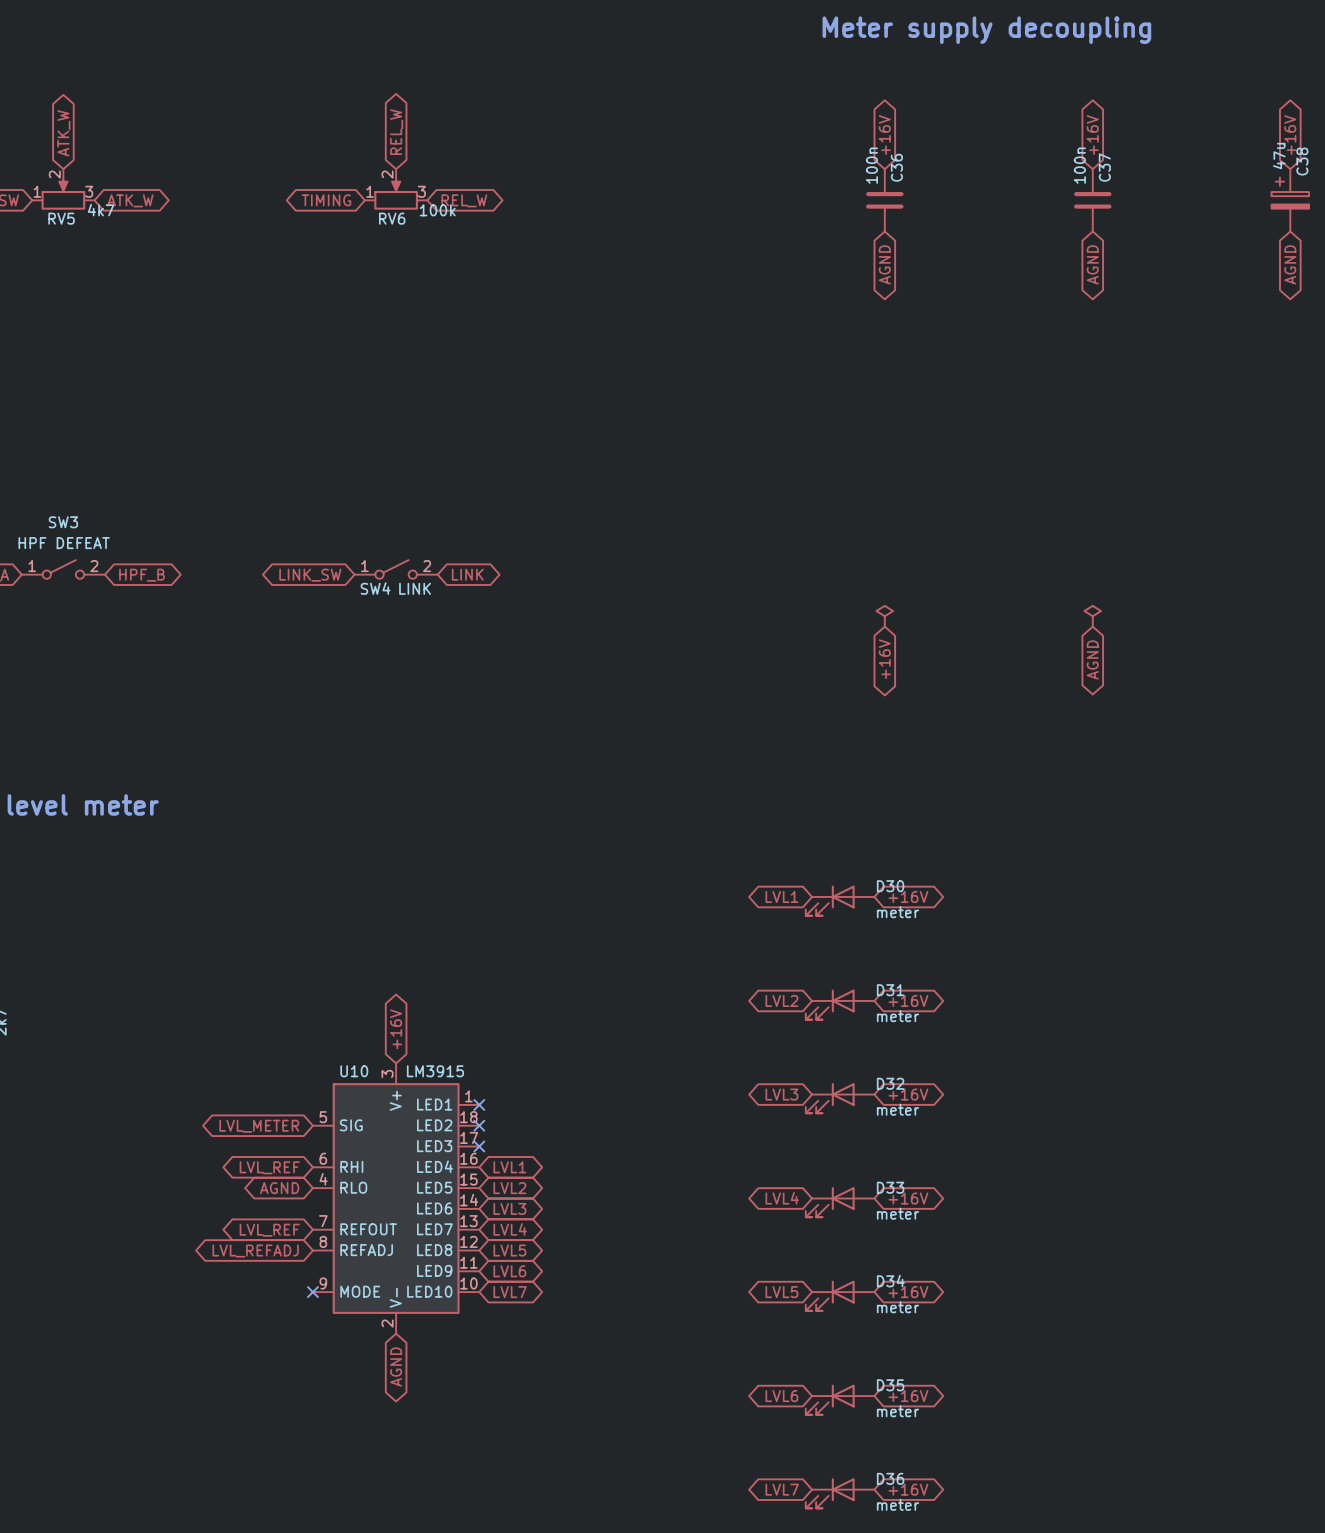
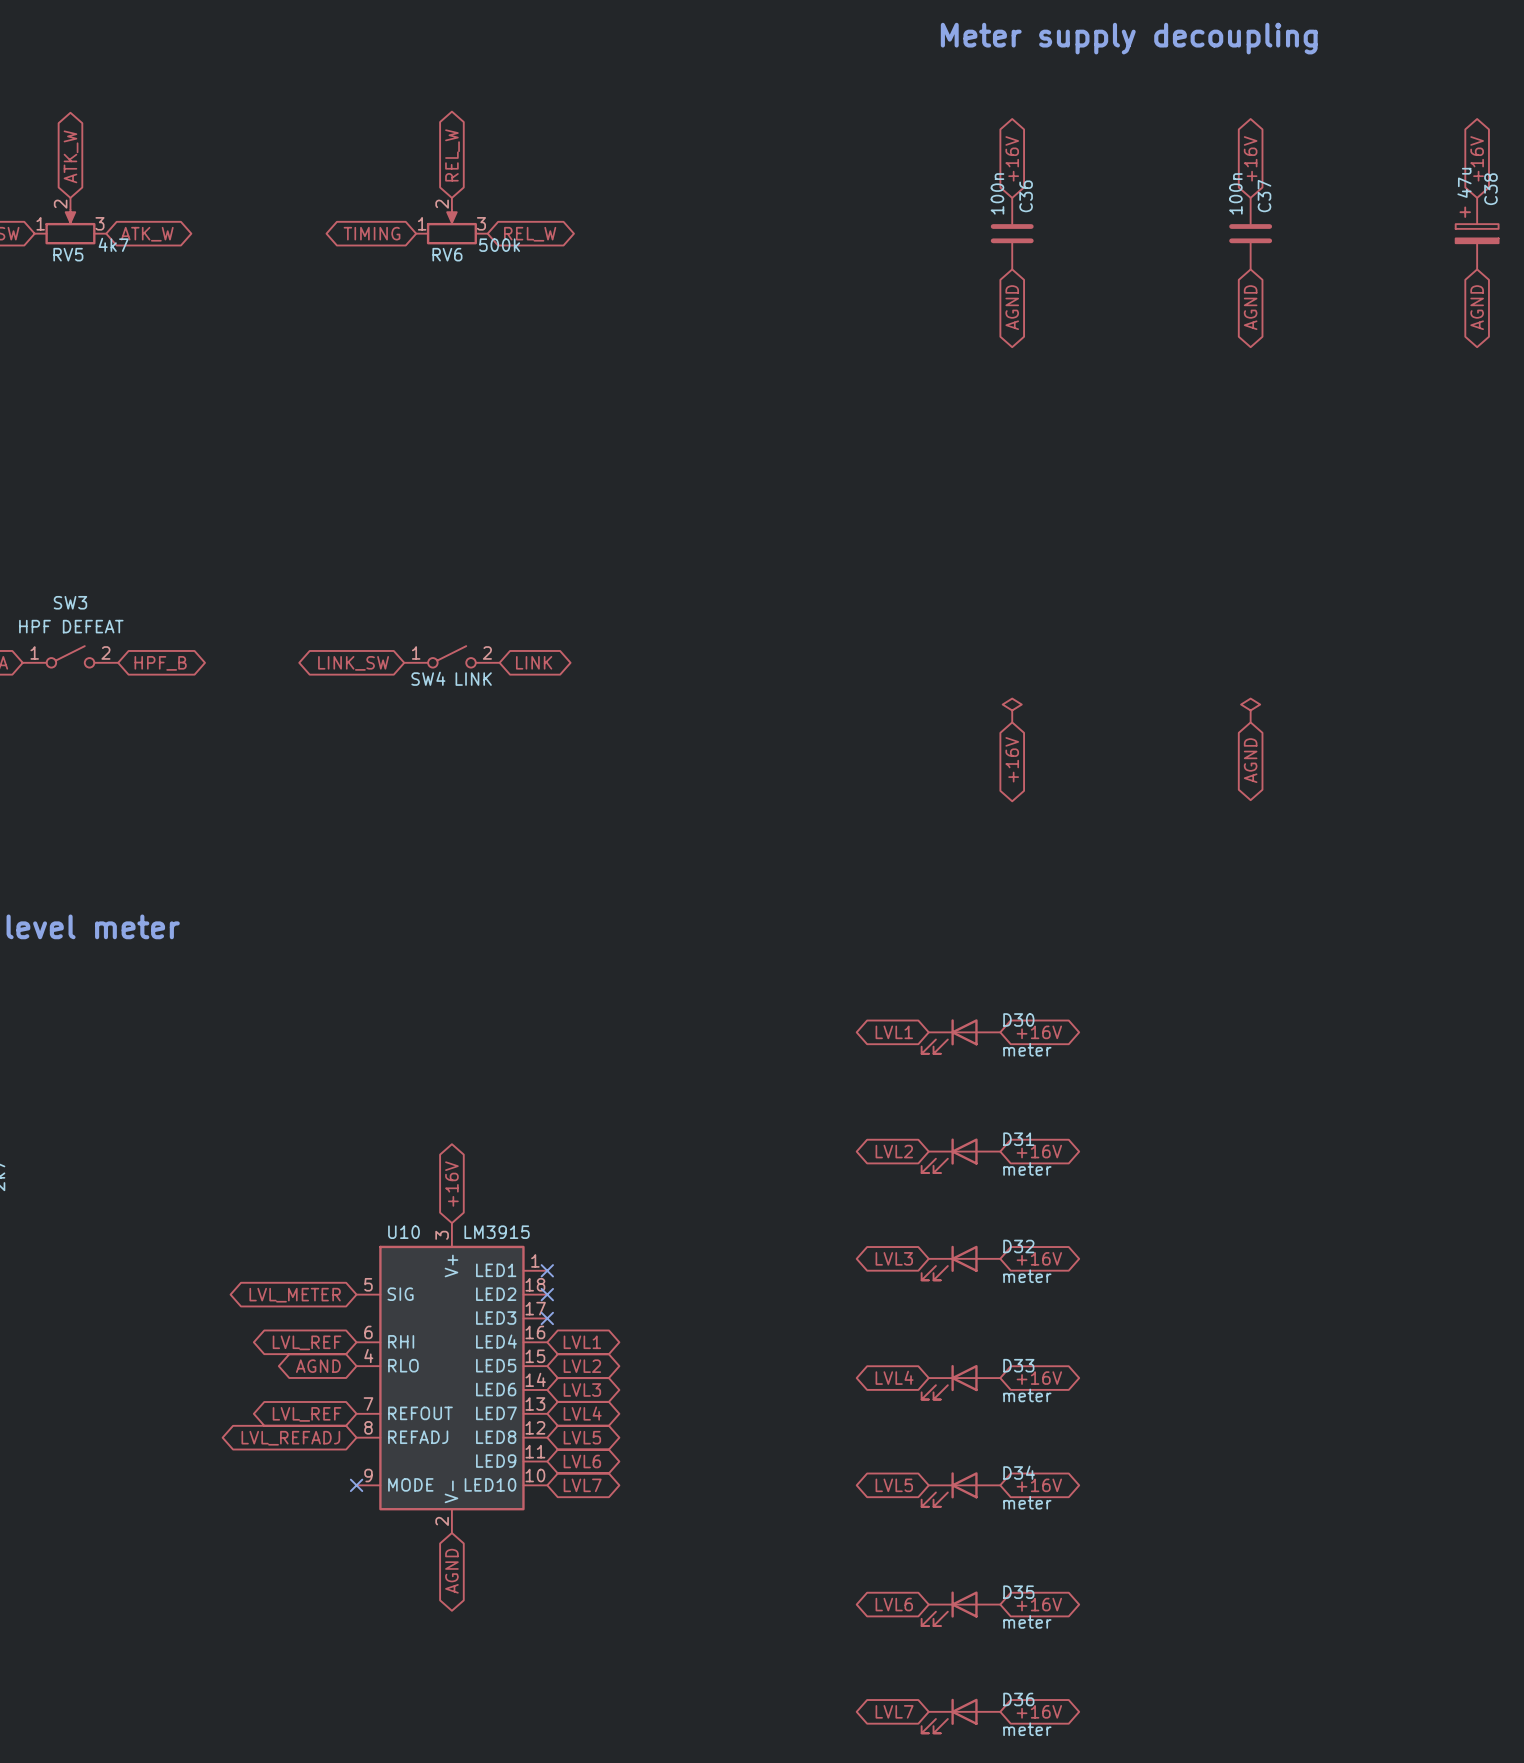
RV6 value: 100k (437, 210) -> 500k (499, 245)

